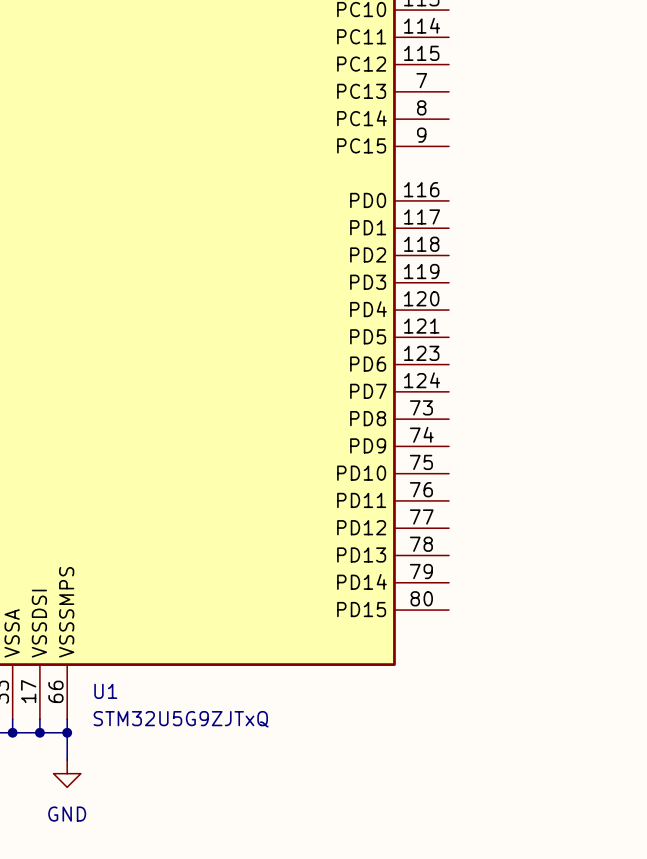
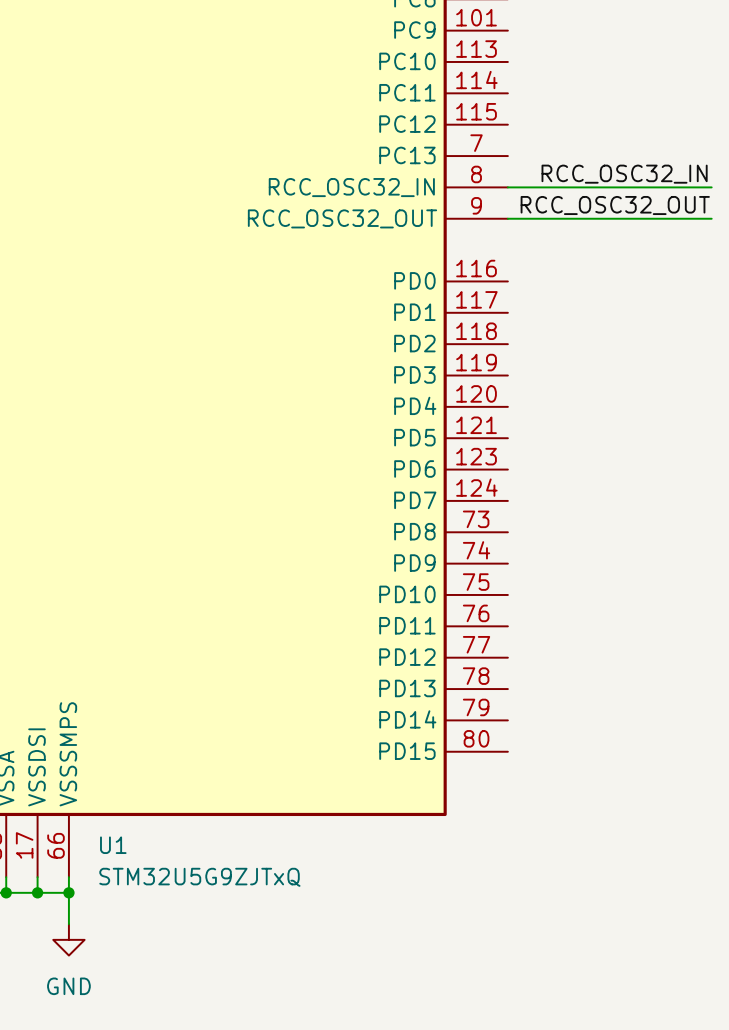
label: none -> RCC_OSC32_IN (624, 174)
U1 pin name: PC14 (361, 118) -> RCC_OSC32_IN (351, 187)
wire: none -> (507, 187) (711, 187)
label: none -> RCC_OSC32_OUT (615, 205)
U1 pin name: PC15 (361, 145) -> RCC_OSC32_OUT (342, 218)
wire: none -> (507, 218) (711, 218)

